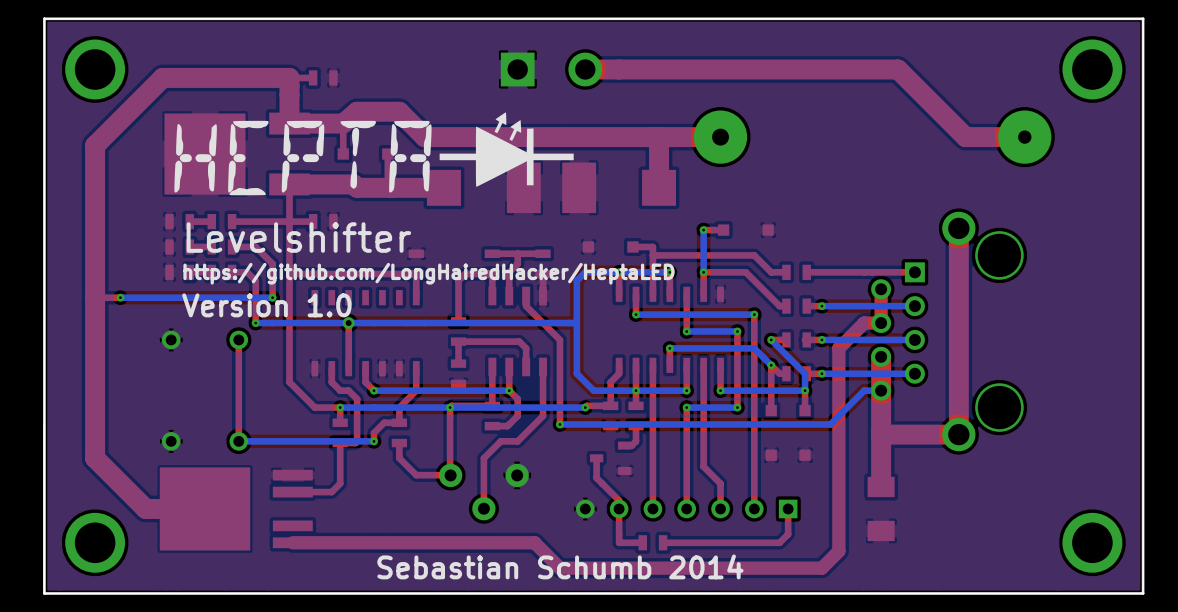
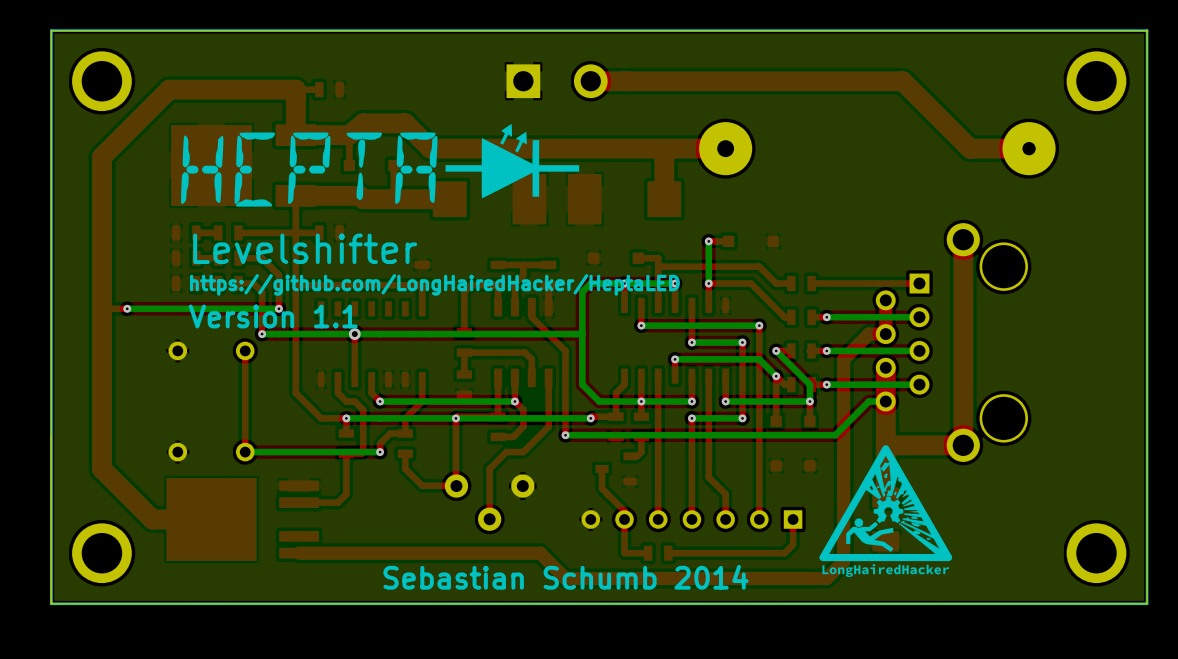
text: Version 1.0 (266, 305) -> Version 1.1 (273, 316)
drawing: none -> [819, 445, 953, 577]

